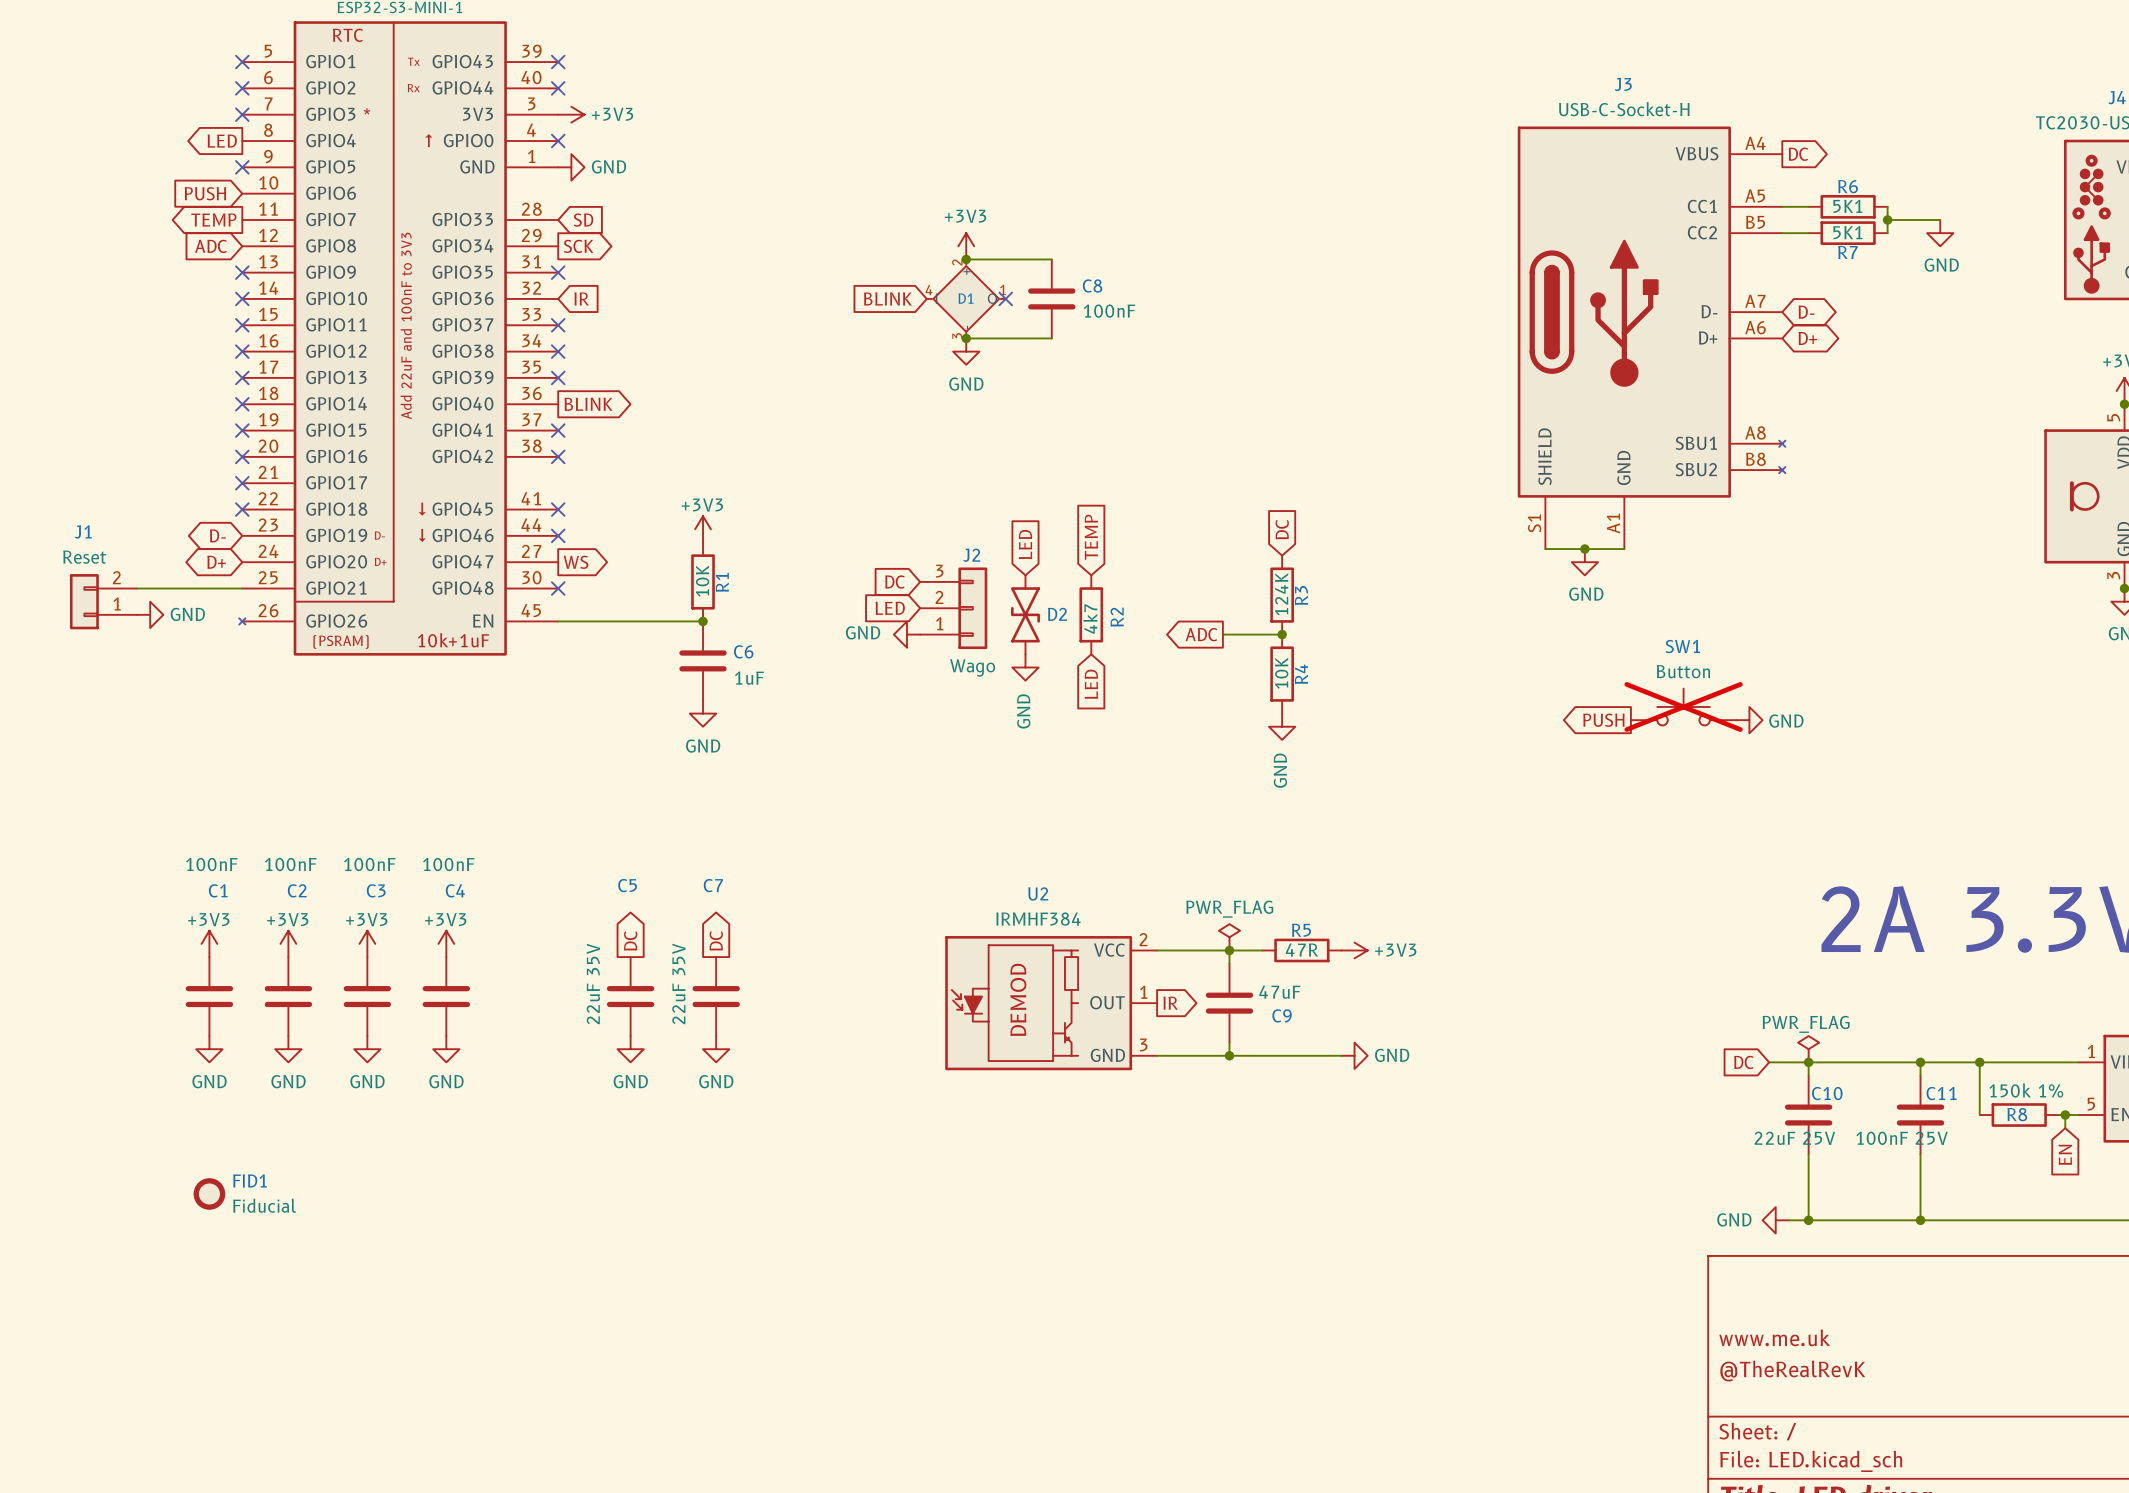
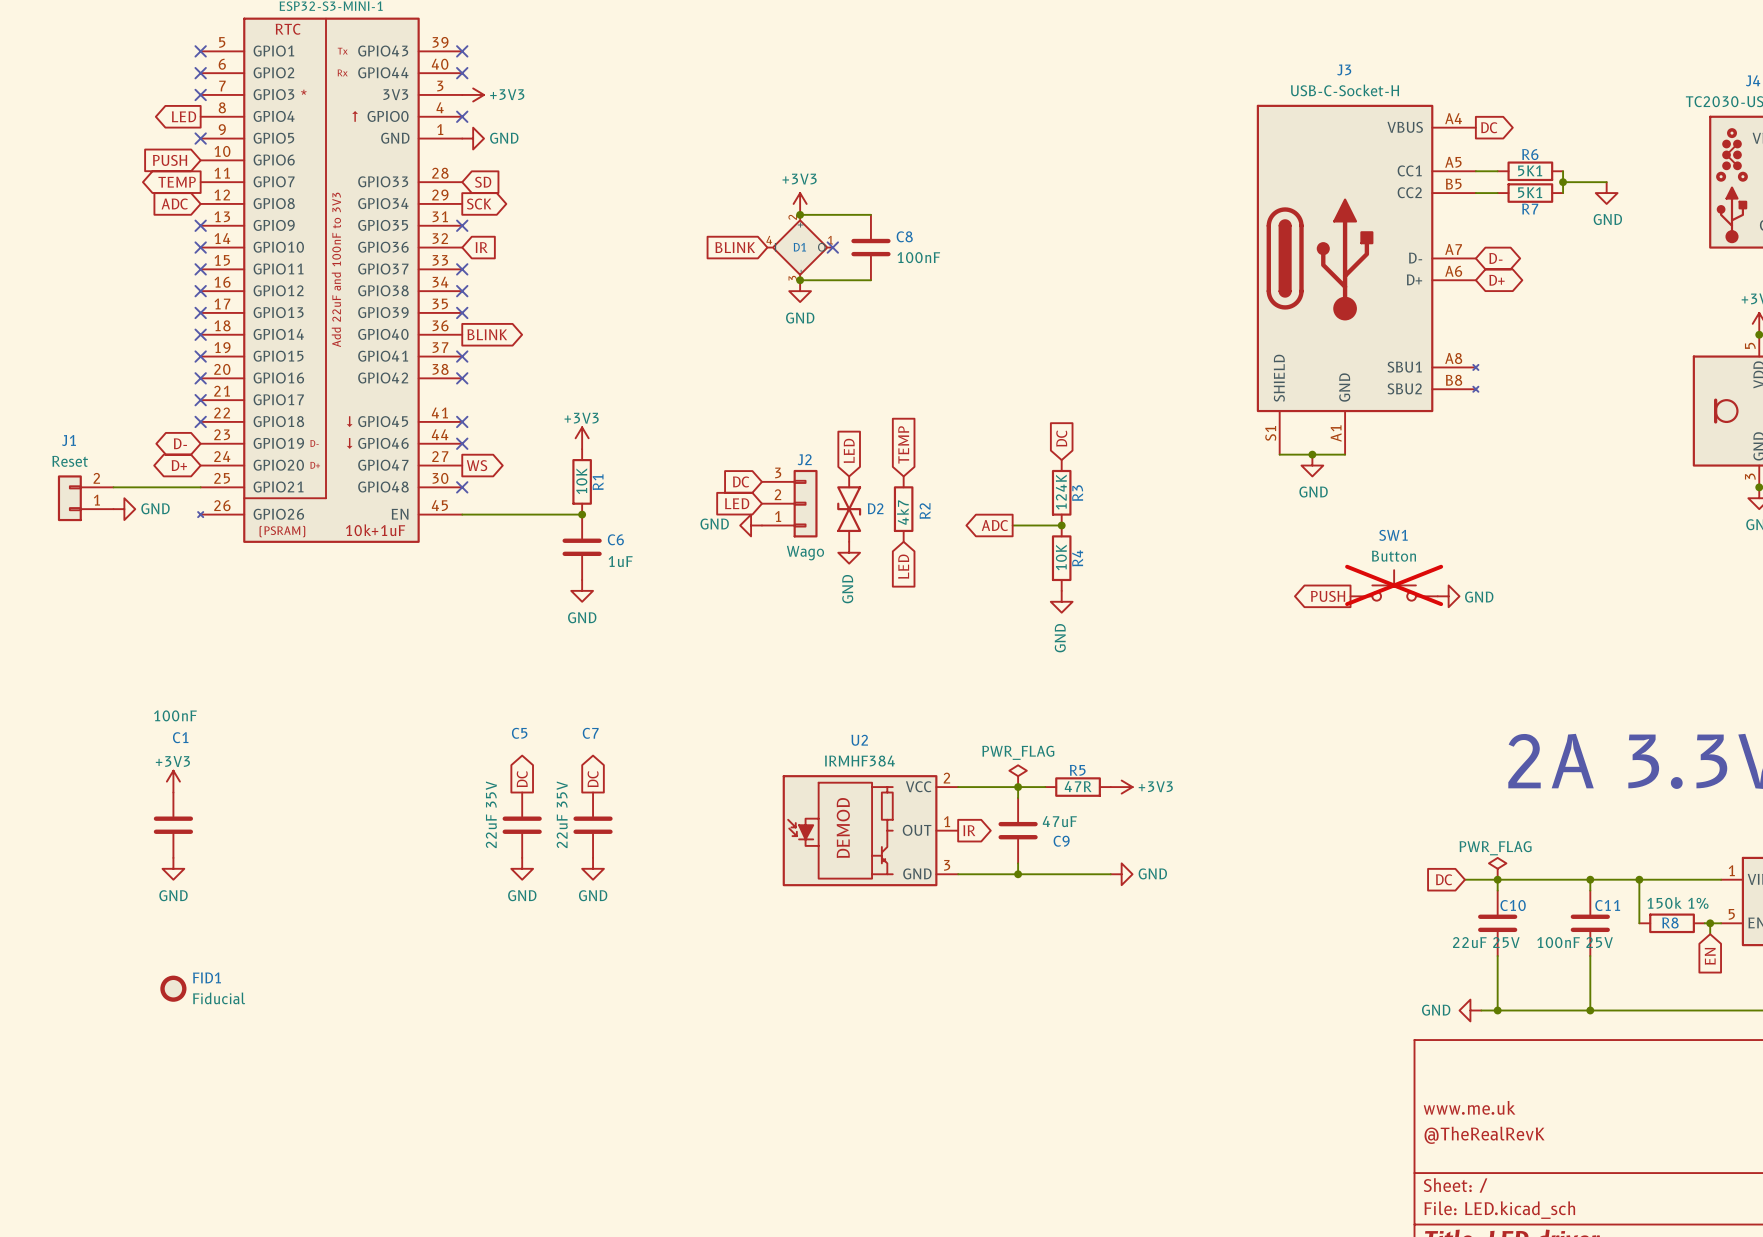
power symbol: +3V3 (288, 943) -> none
power symbol: +3V3 (367, 943) -> none
power symbol: +3V3 (446, 943) -> none
C2: 100nF (288, 996) -> none
C3: 100nF (367, 996) -> none
C4: 100nF (446, 996) -> none
power symbol: GND (288, 1049) -> none
power symbol: GND (367, 1049) -> none
power symbol: GND (446, 1049) -> none

